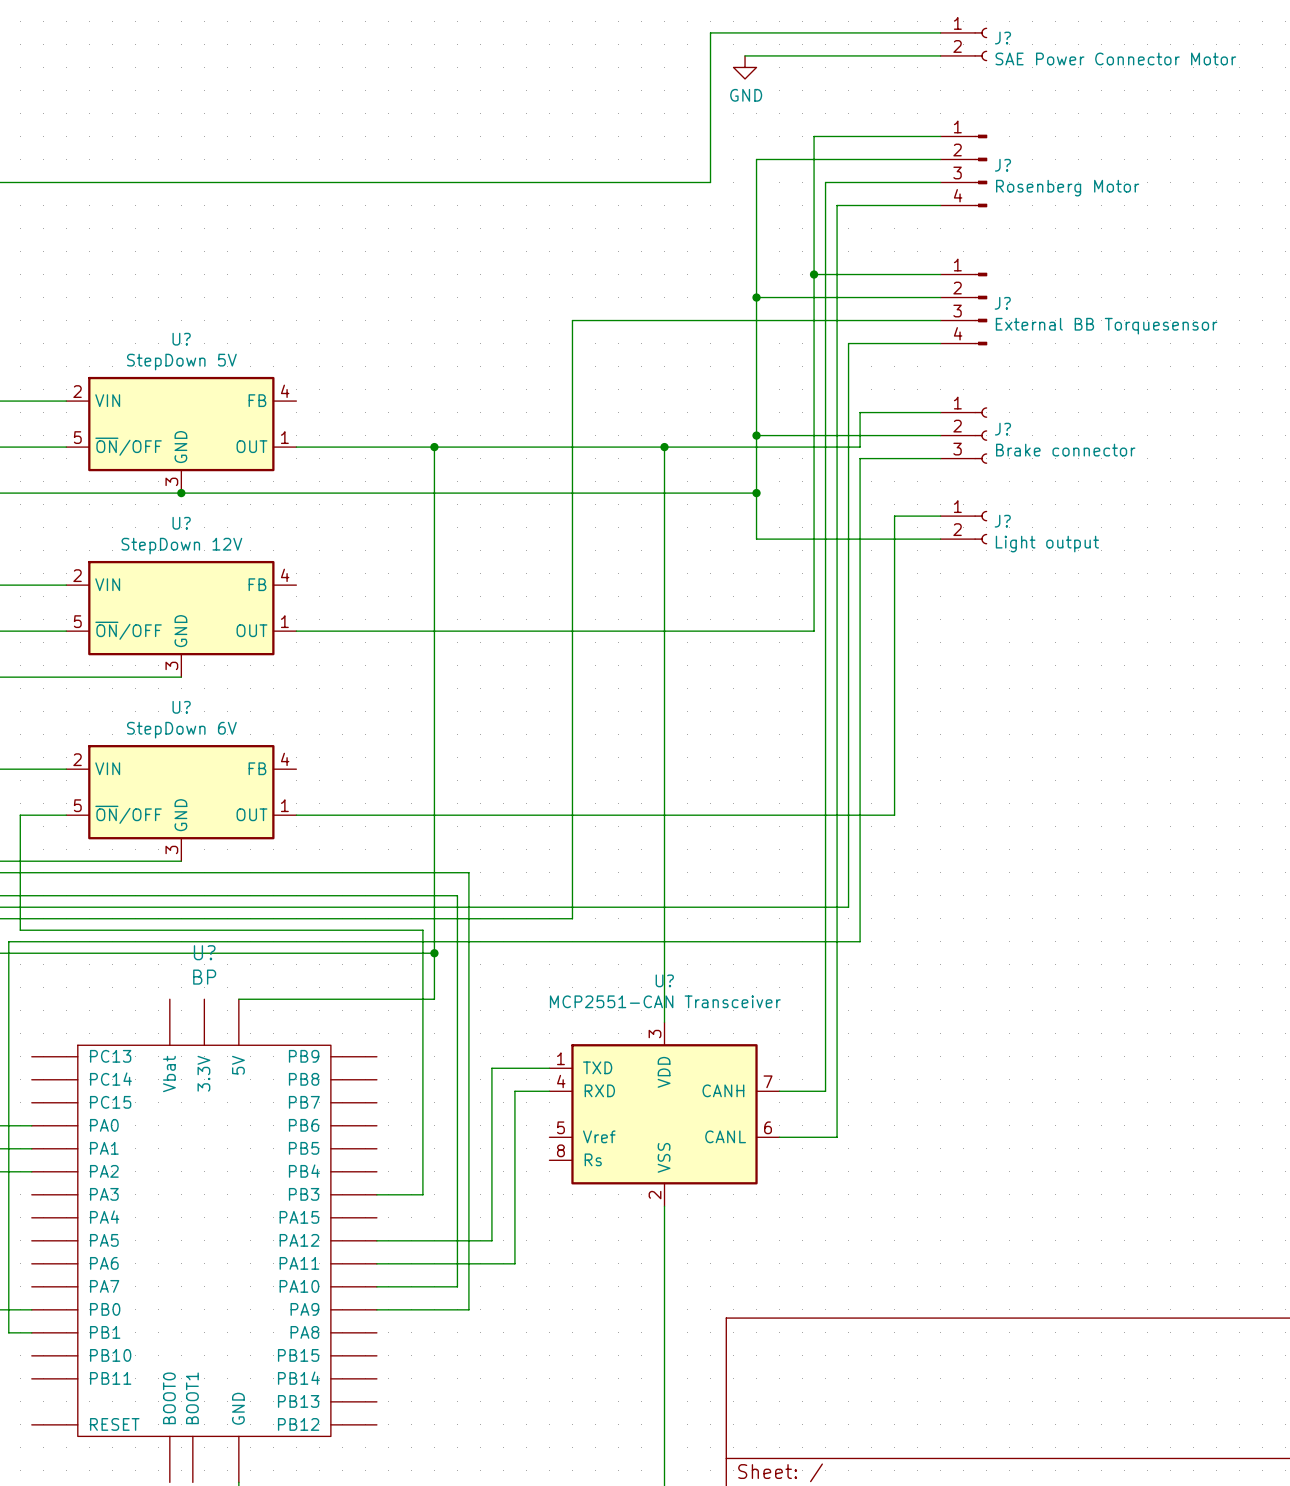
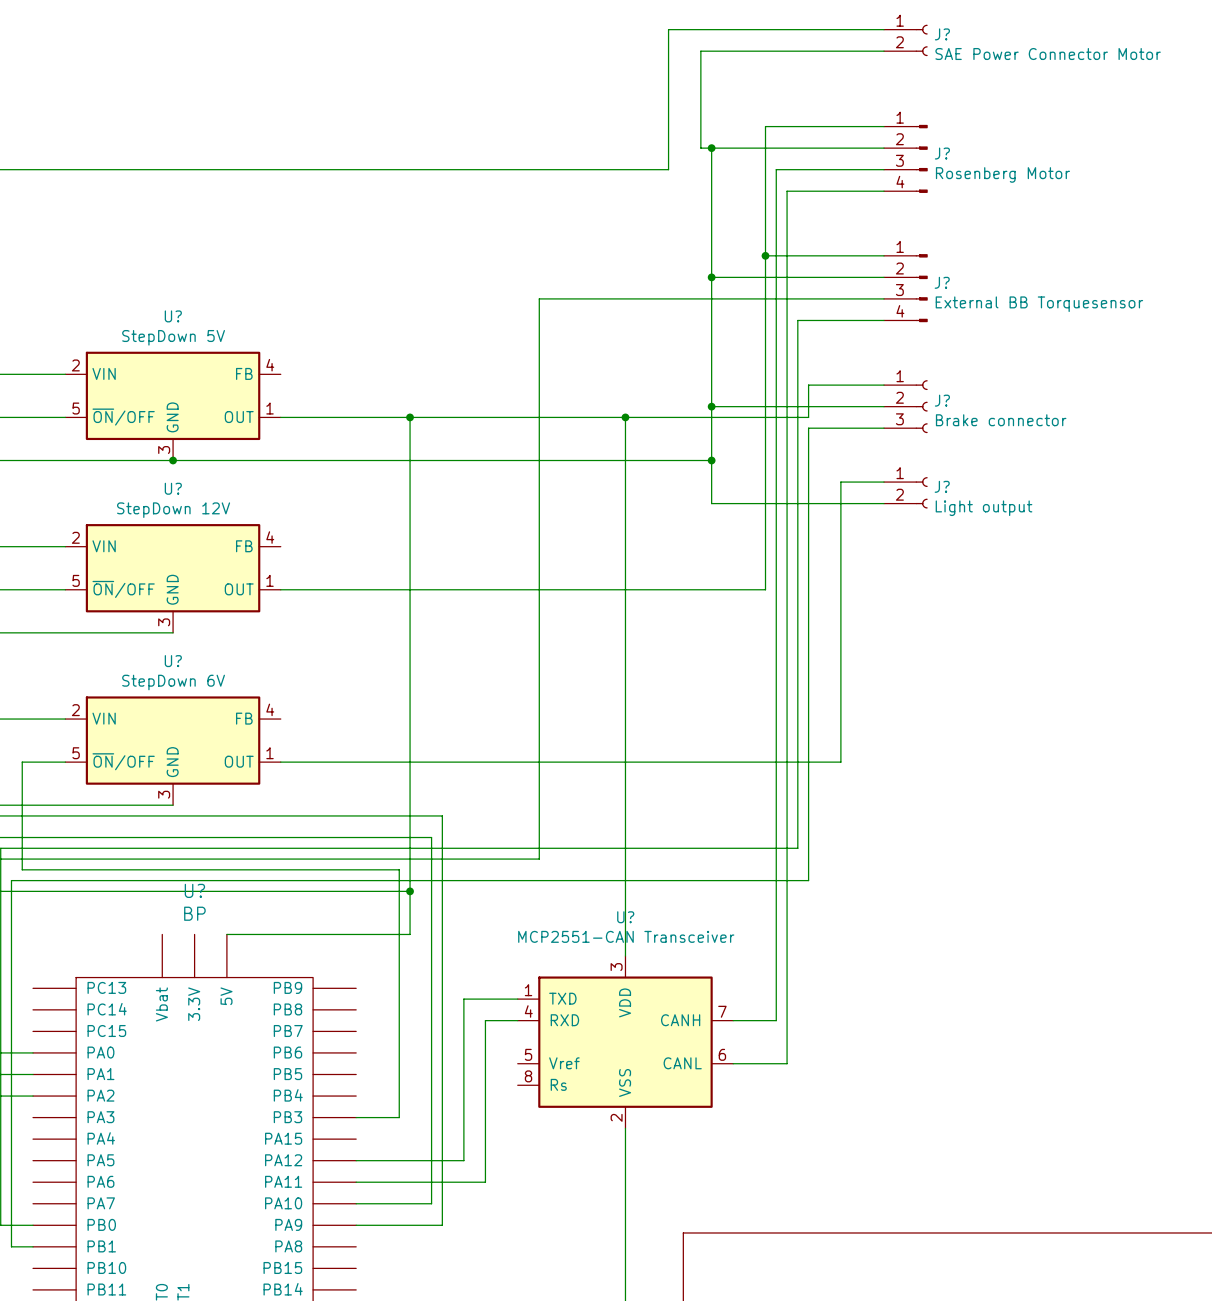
wire: none -> (700, 51) (700, 148) (711, 148)
power symbol: GND (745, 67) -> none
junction: none -> (711, 148)

